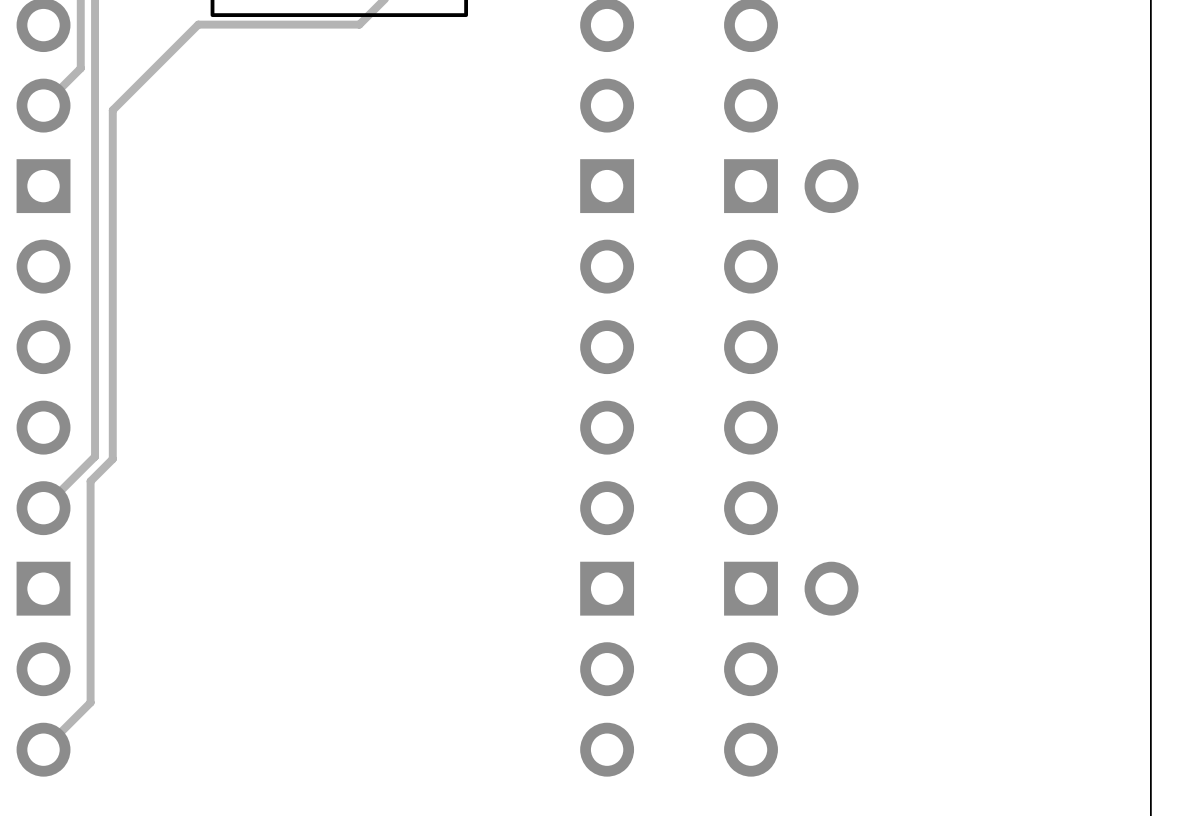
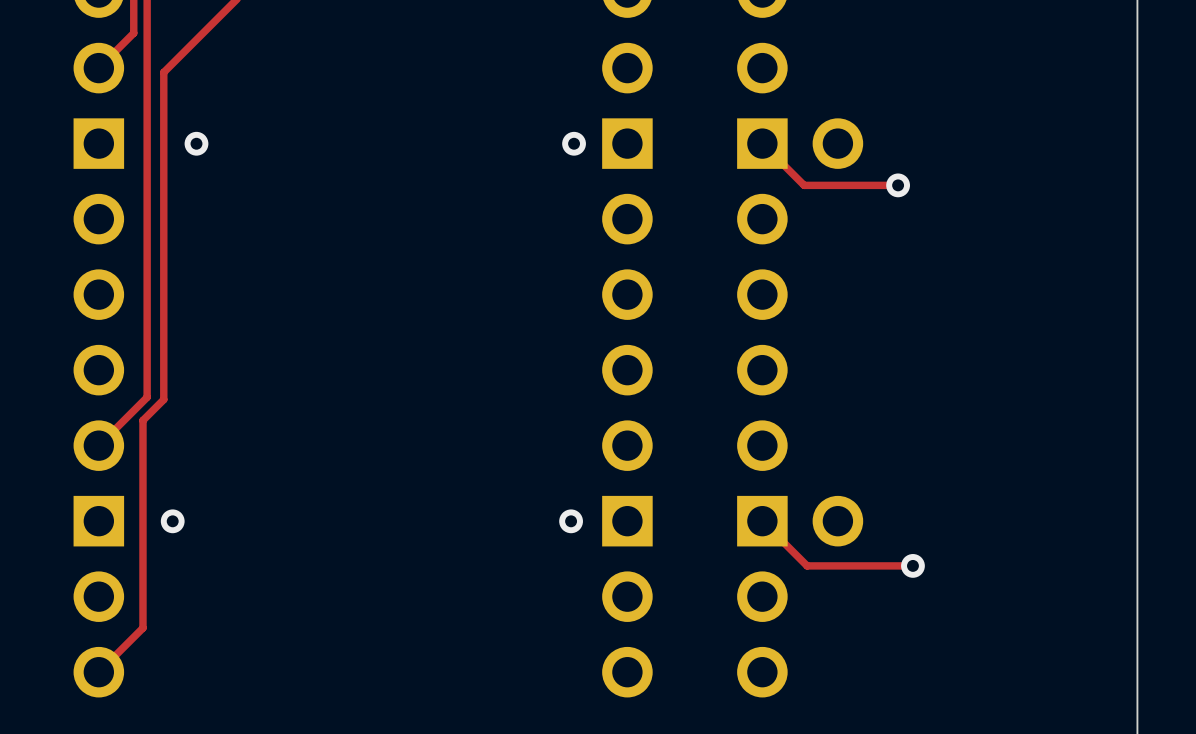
via: none -> (196, 143)
via: none -> (574, 143)
track: none -> (762, 143) (804, 185) (898, 185)
via: none -> (898, 185)
via: none -> (172, 521)
via: none -> (571, 521)
track: none -> (762, 521) (807, 565) (912, 565)
via: none -> (912, 565)

